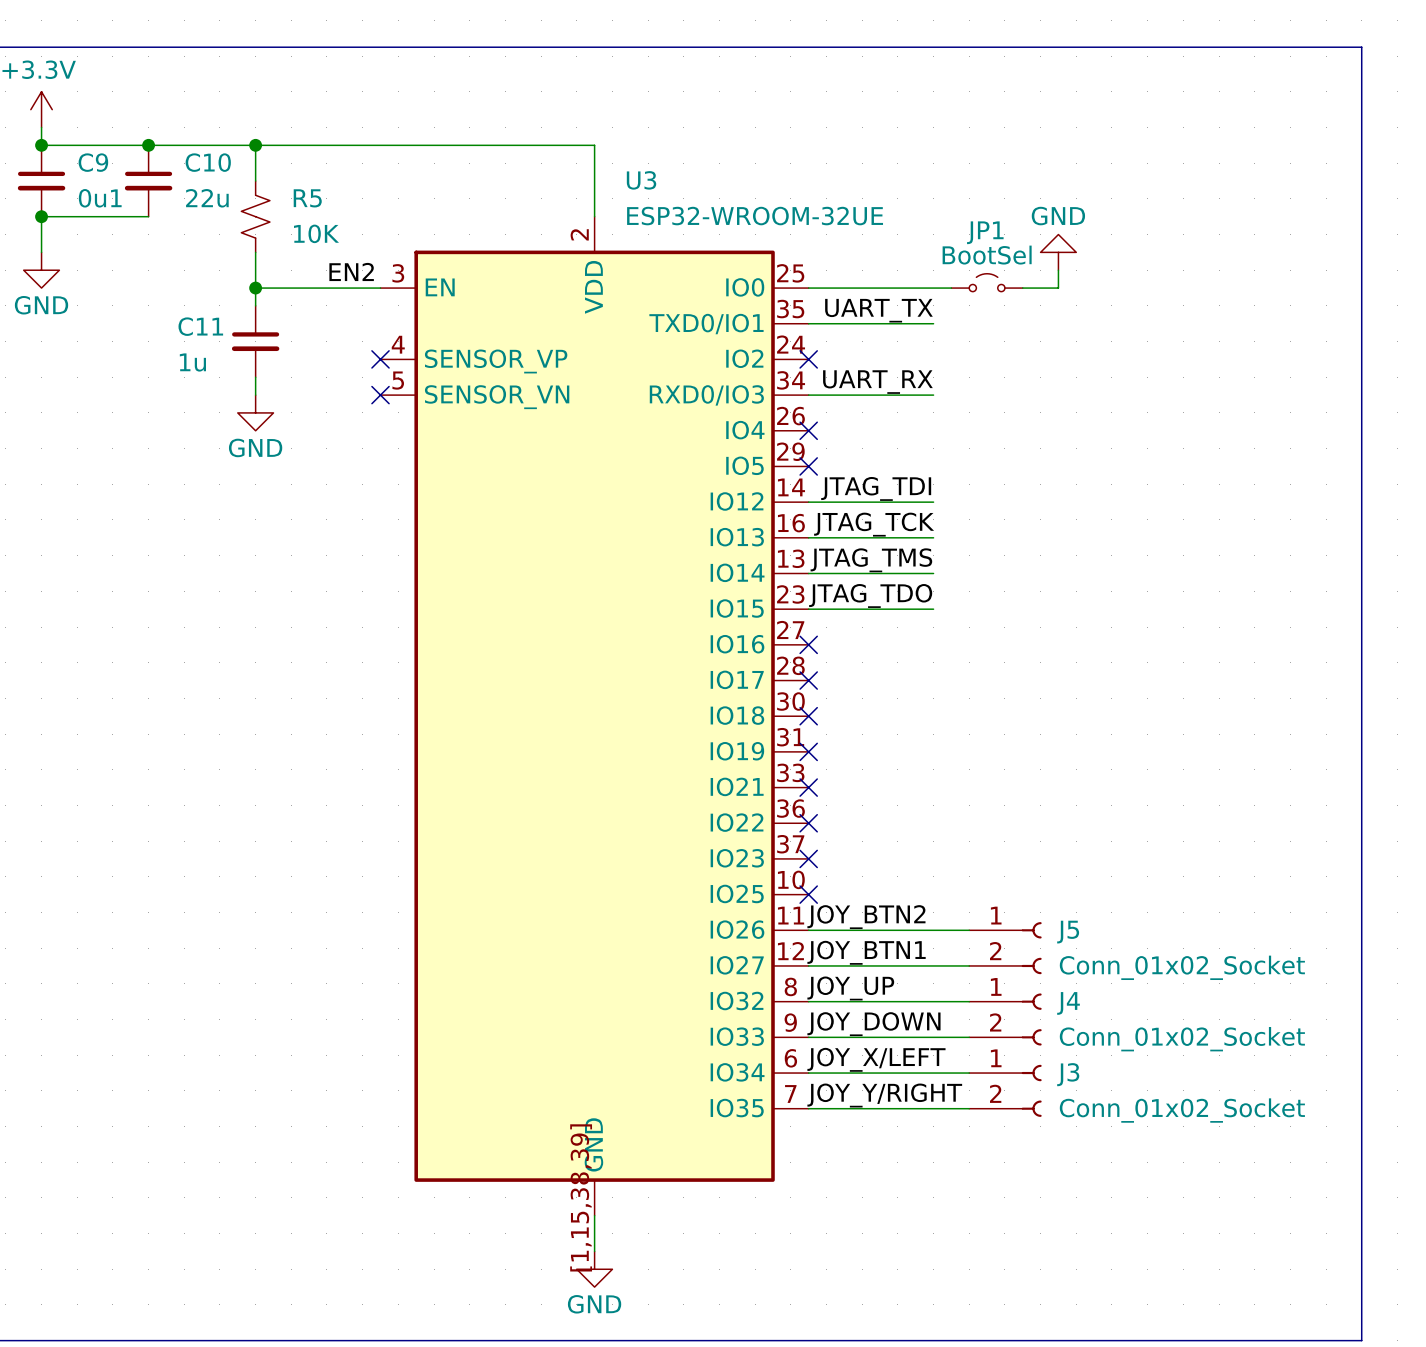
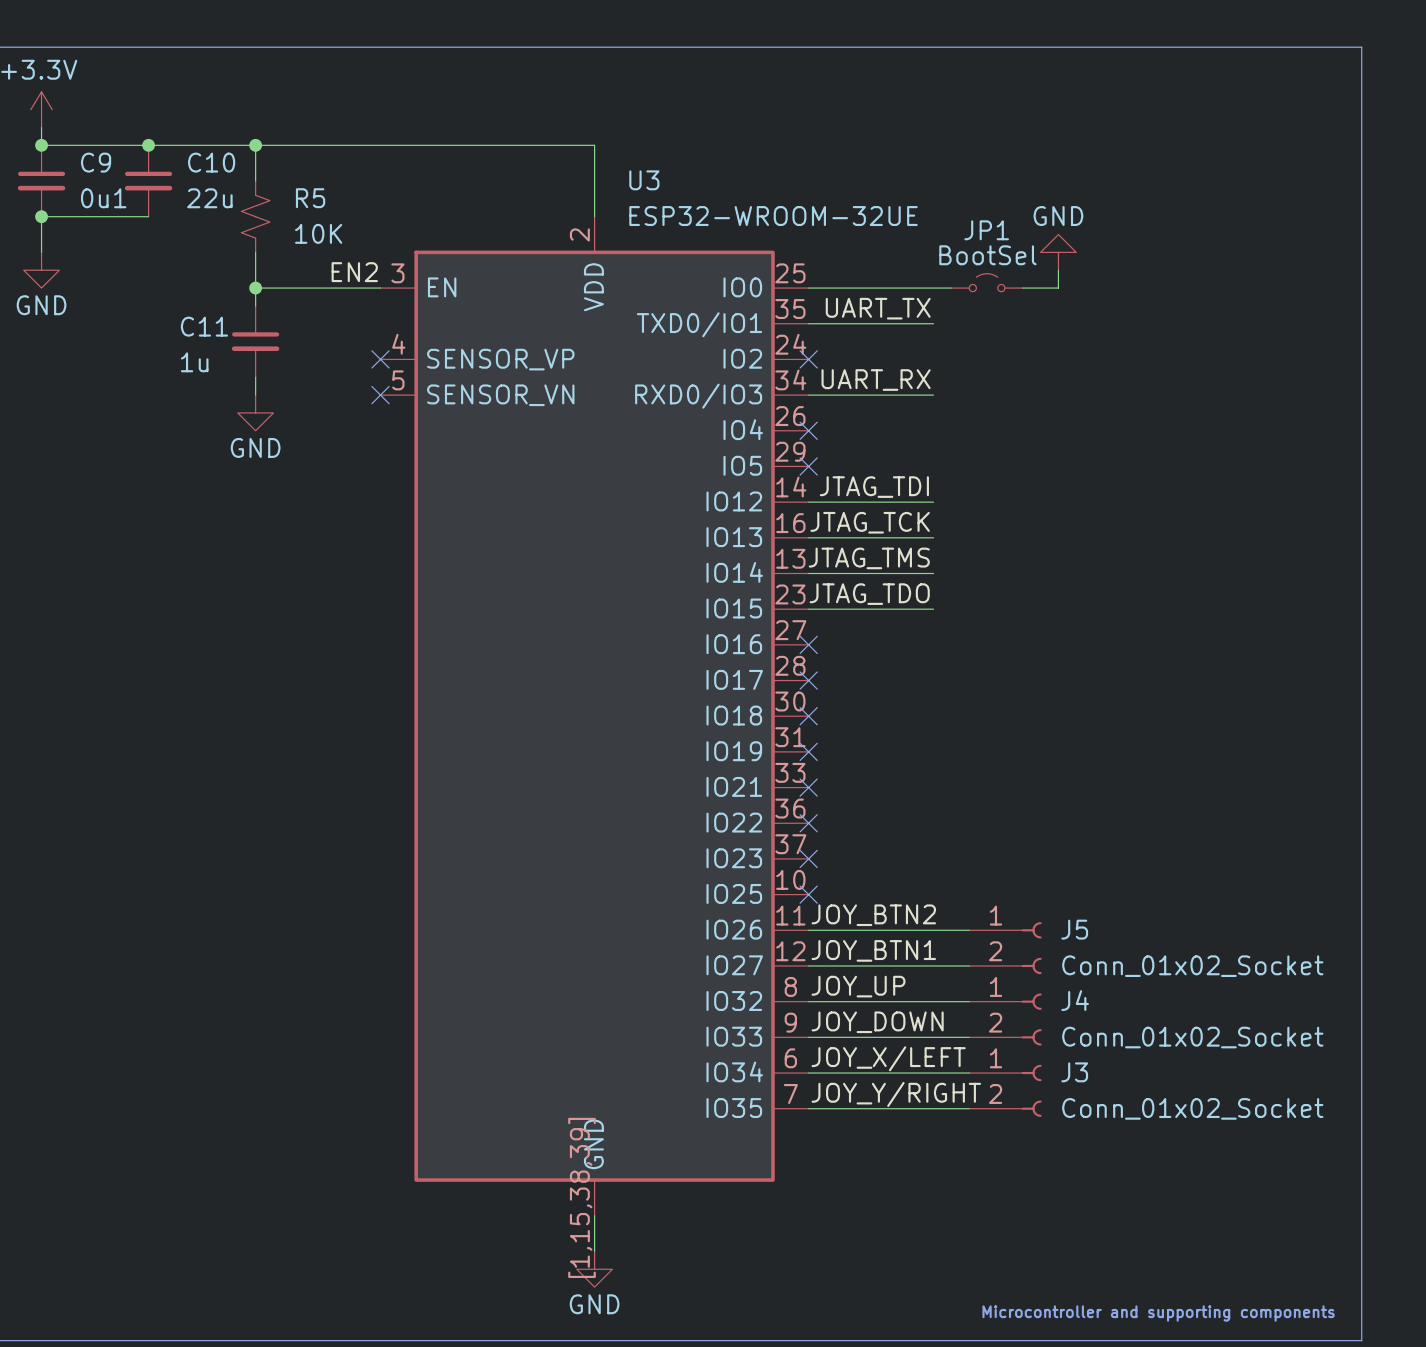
text: none -> Microcontroller and supporting components (1158, 1313)

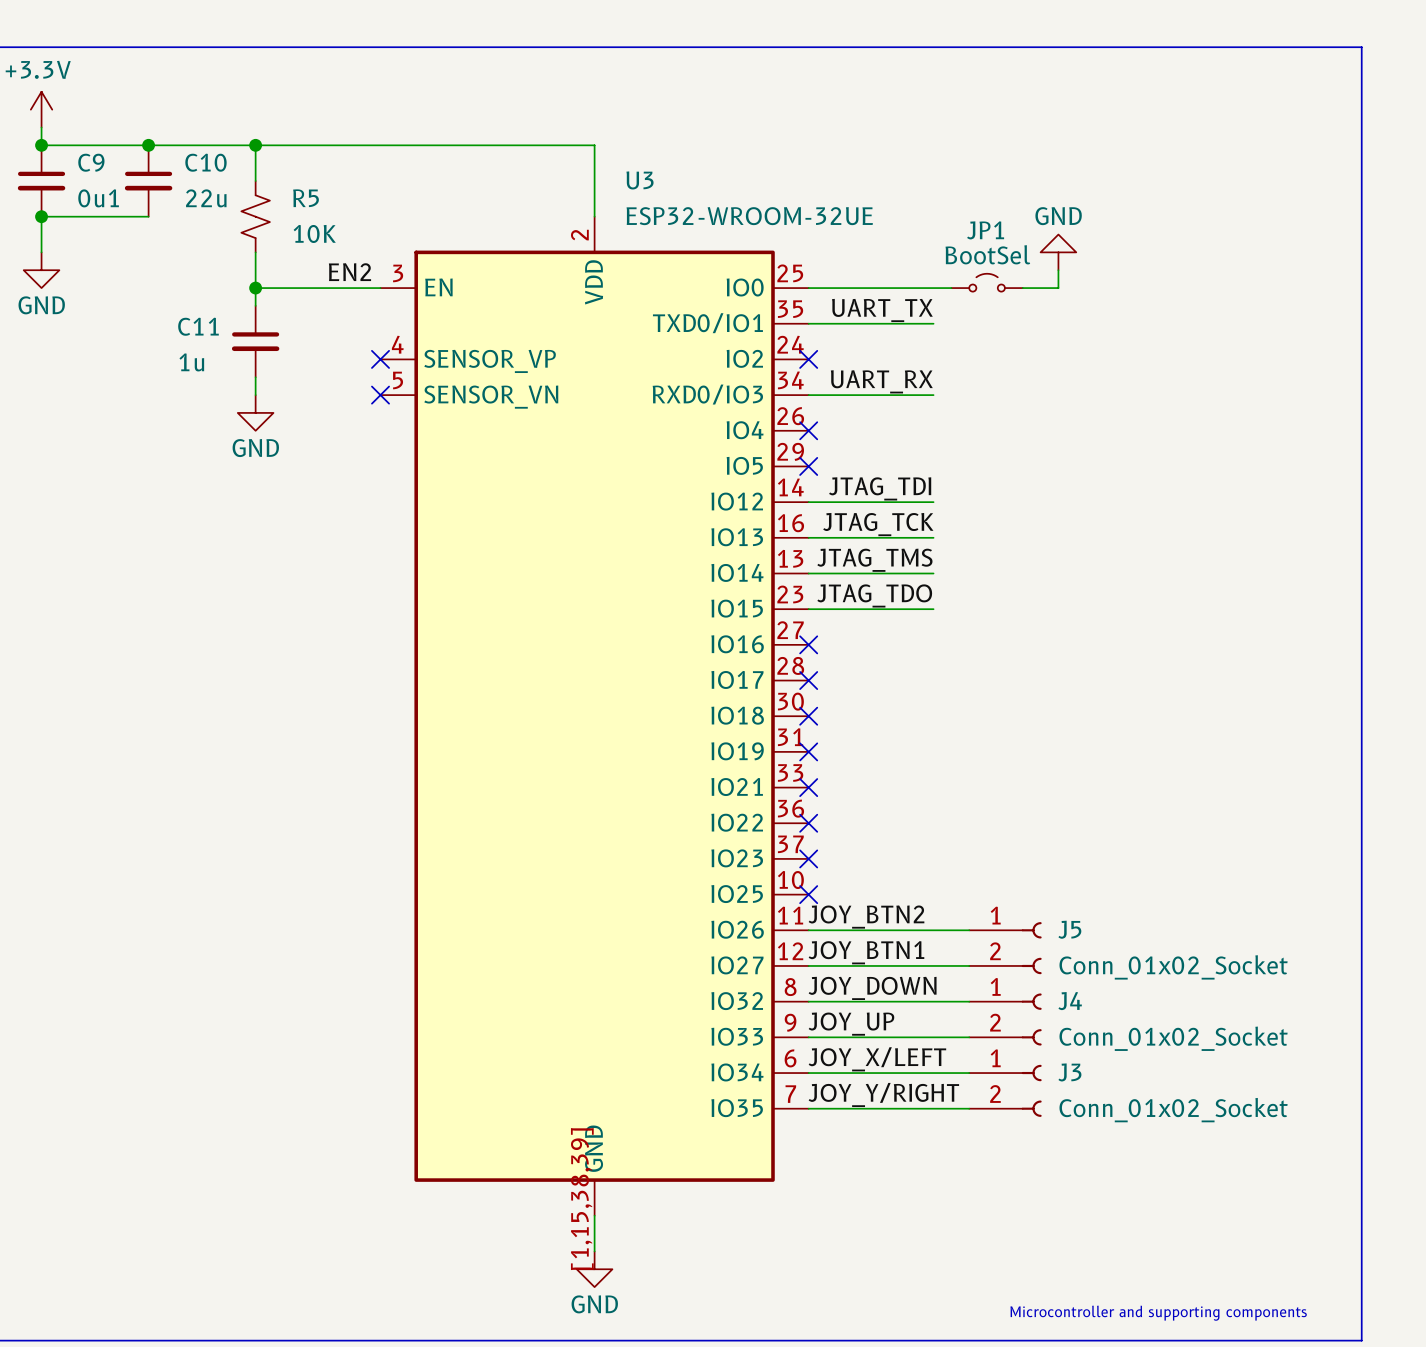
label: JOY_UP (858, 986) -> JOY_DOWN (872, 988)
label: JOY_DOWN (877, 1022) -> JOY_UP (851, 1024)

